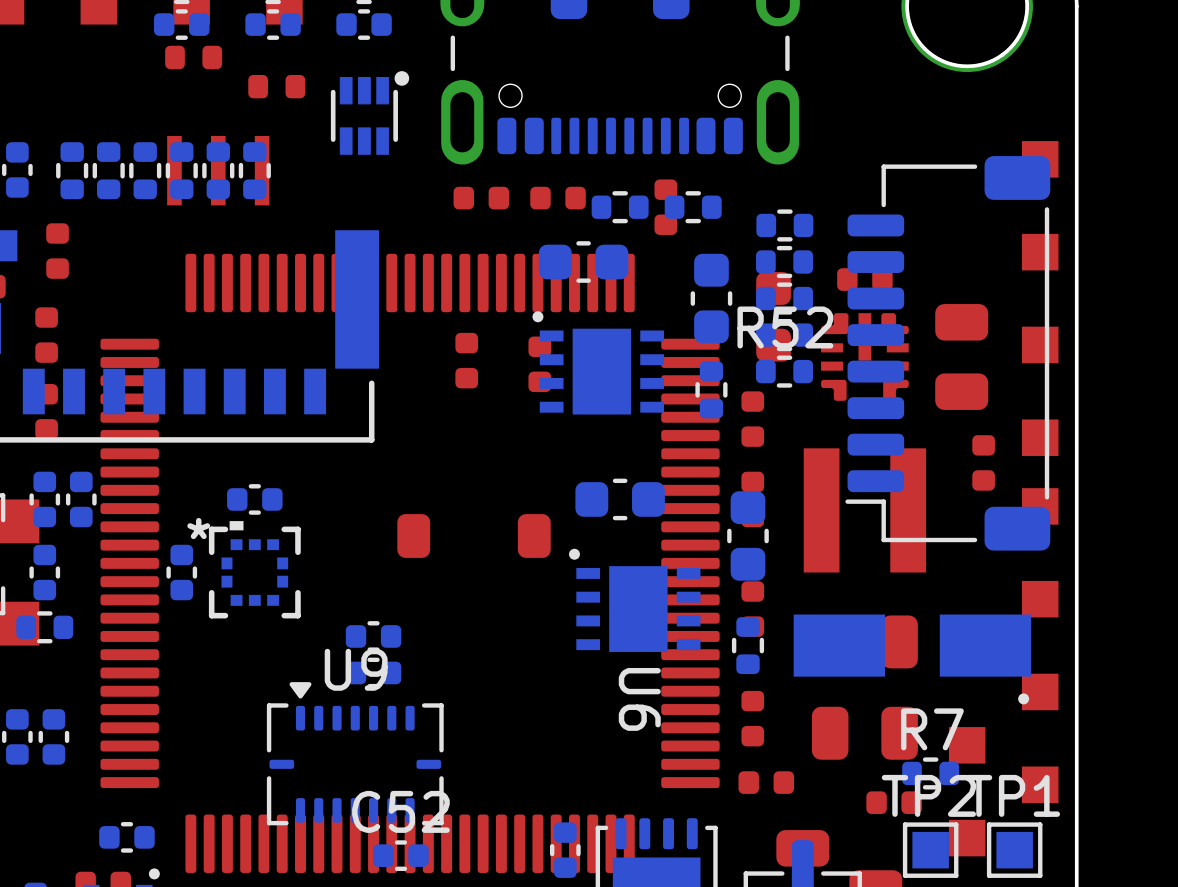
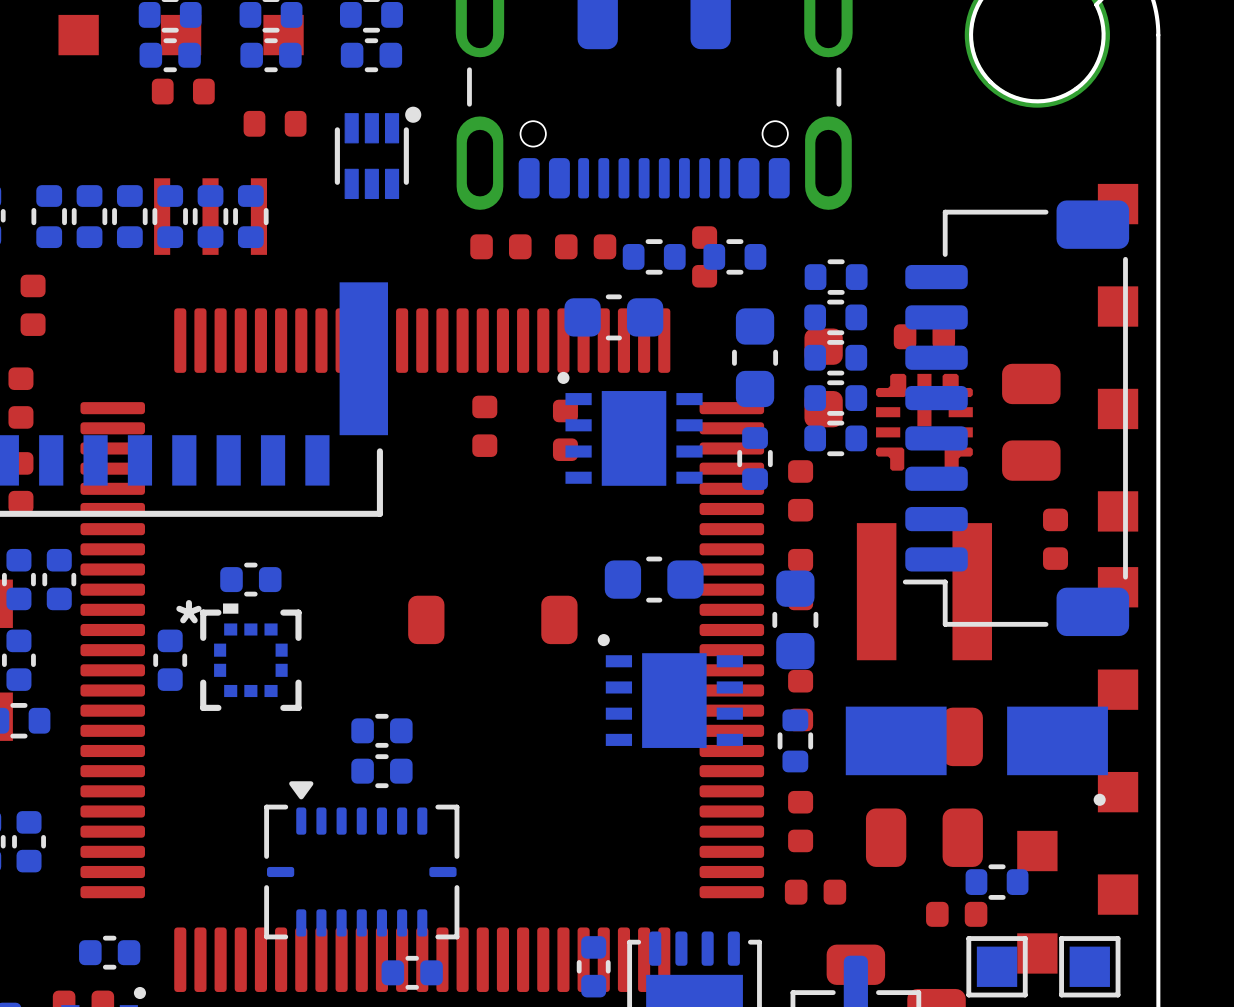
R52 name: R52 (785, 327) -> none
U9 name: U9 (356, 669) -> none
U6 name: U6 (639, 699) -> none
R7 name: R7 (932, 729) -> none
TP2 name: TP2 (928, 795) -> none
TP1 name: TP1 (1012, 795) -> none
C52 name: C52 (400, 811) -> none

